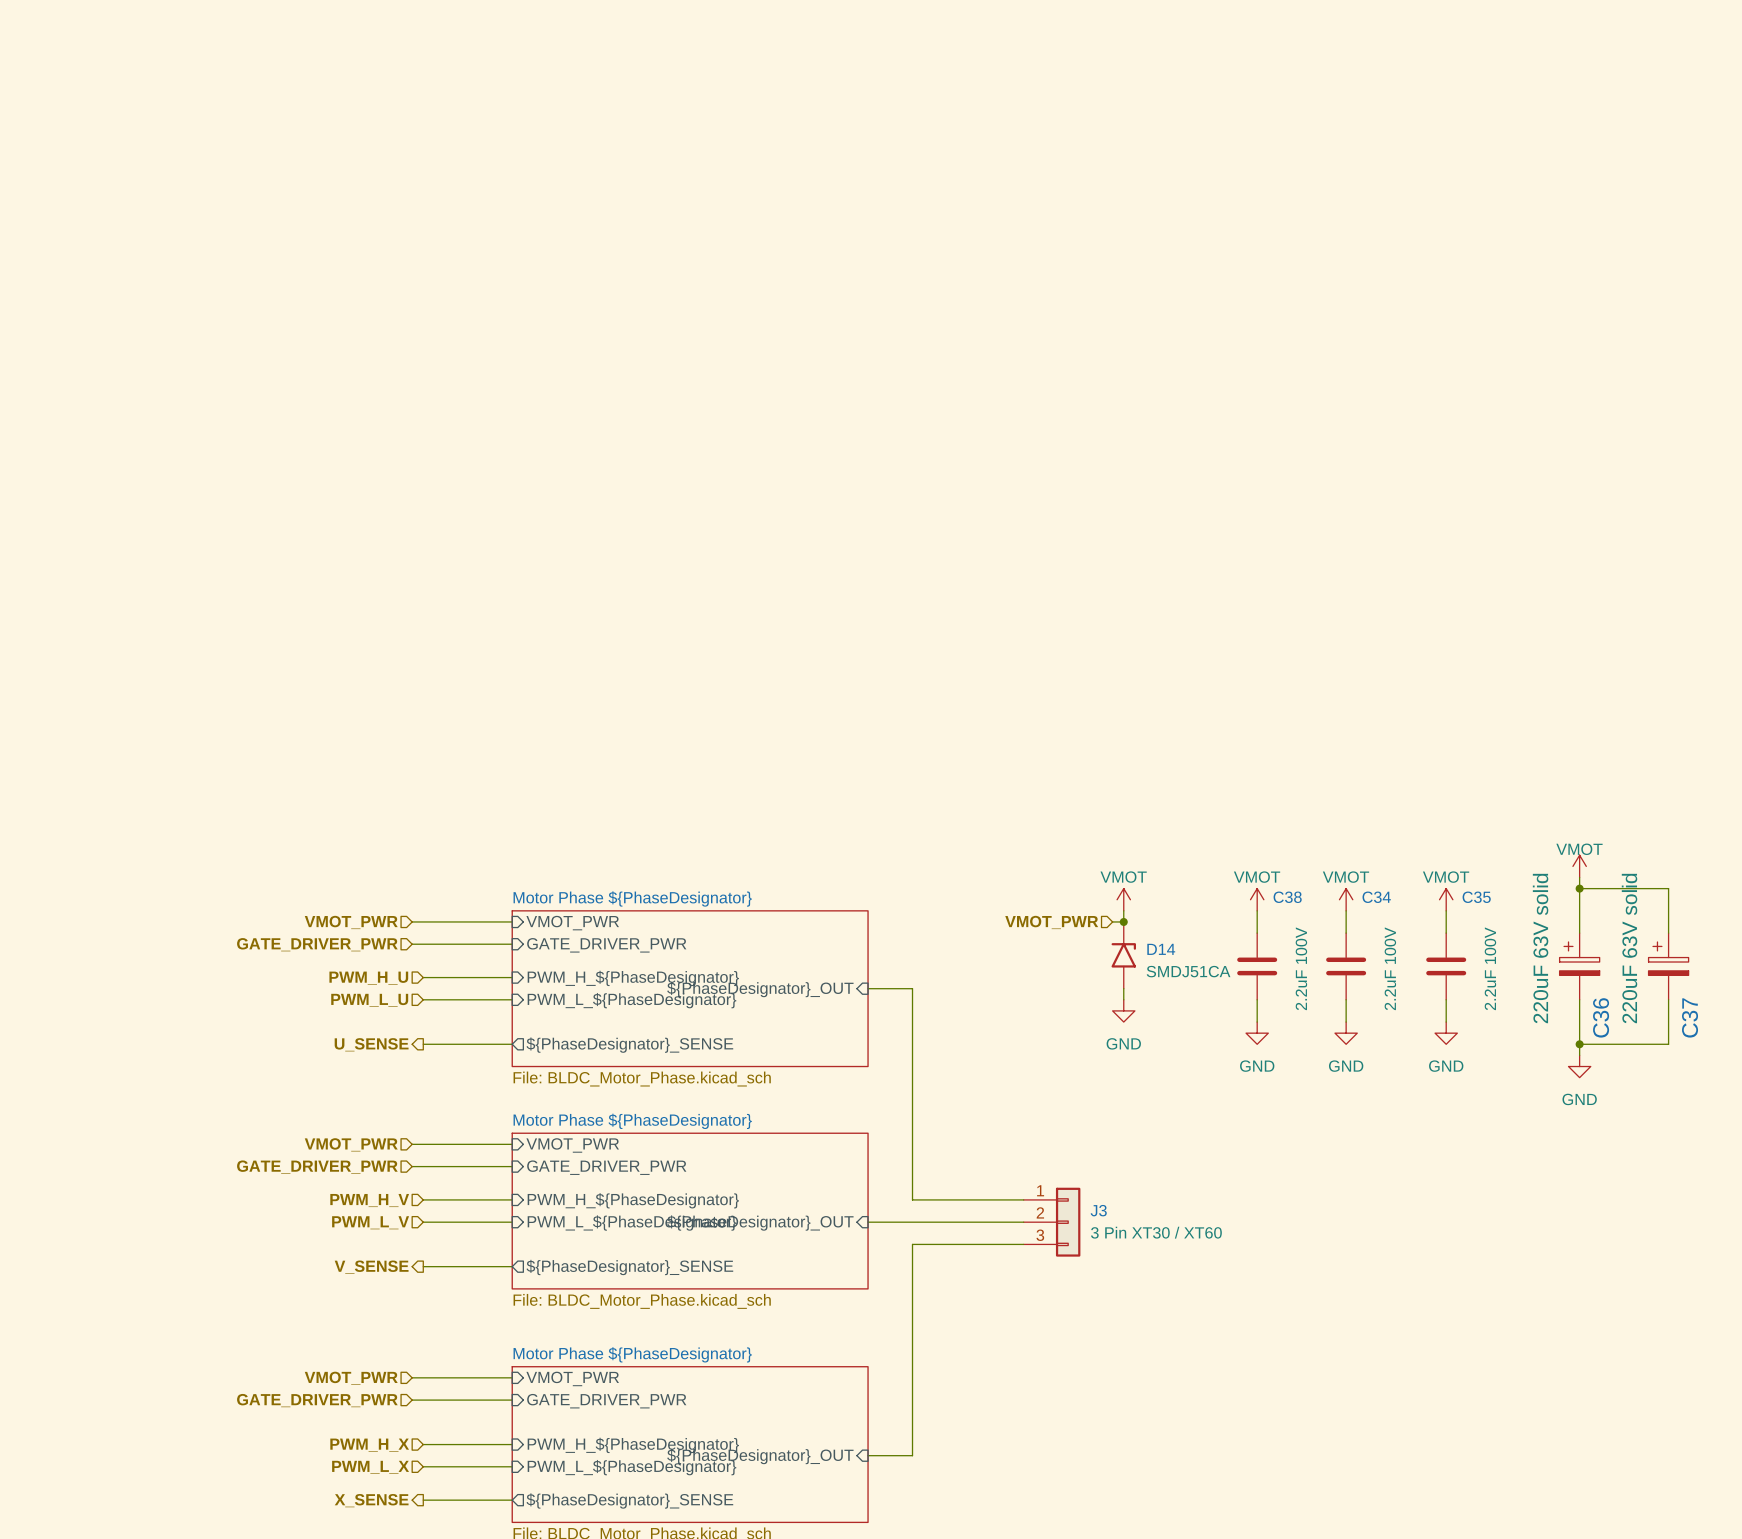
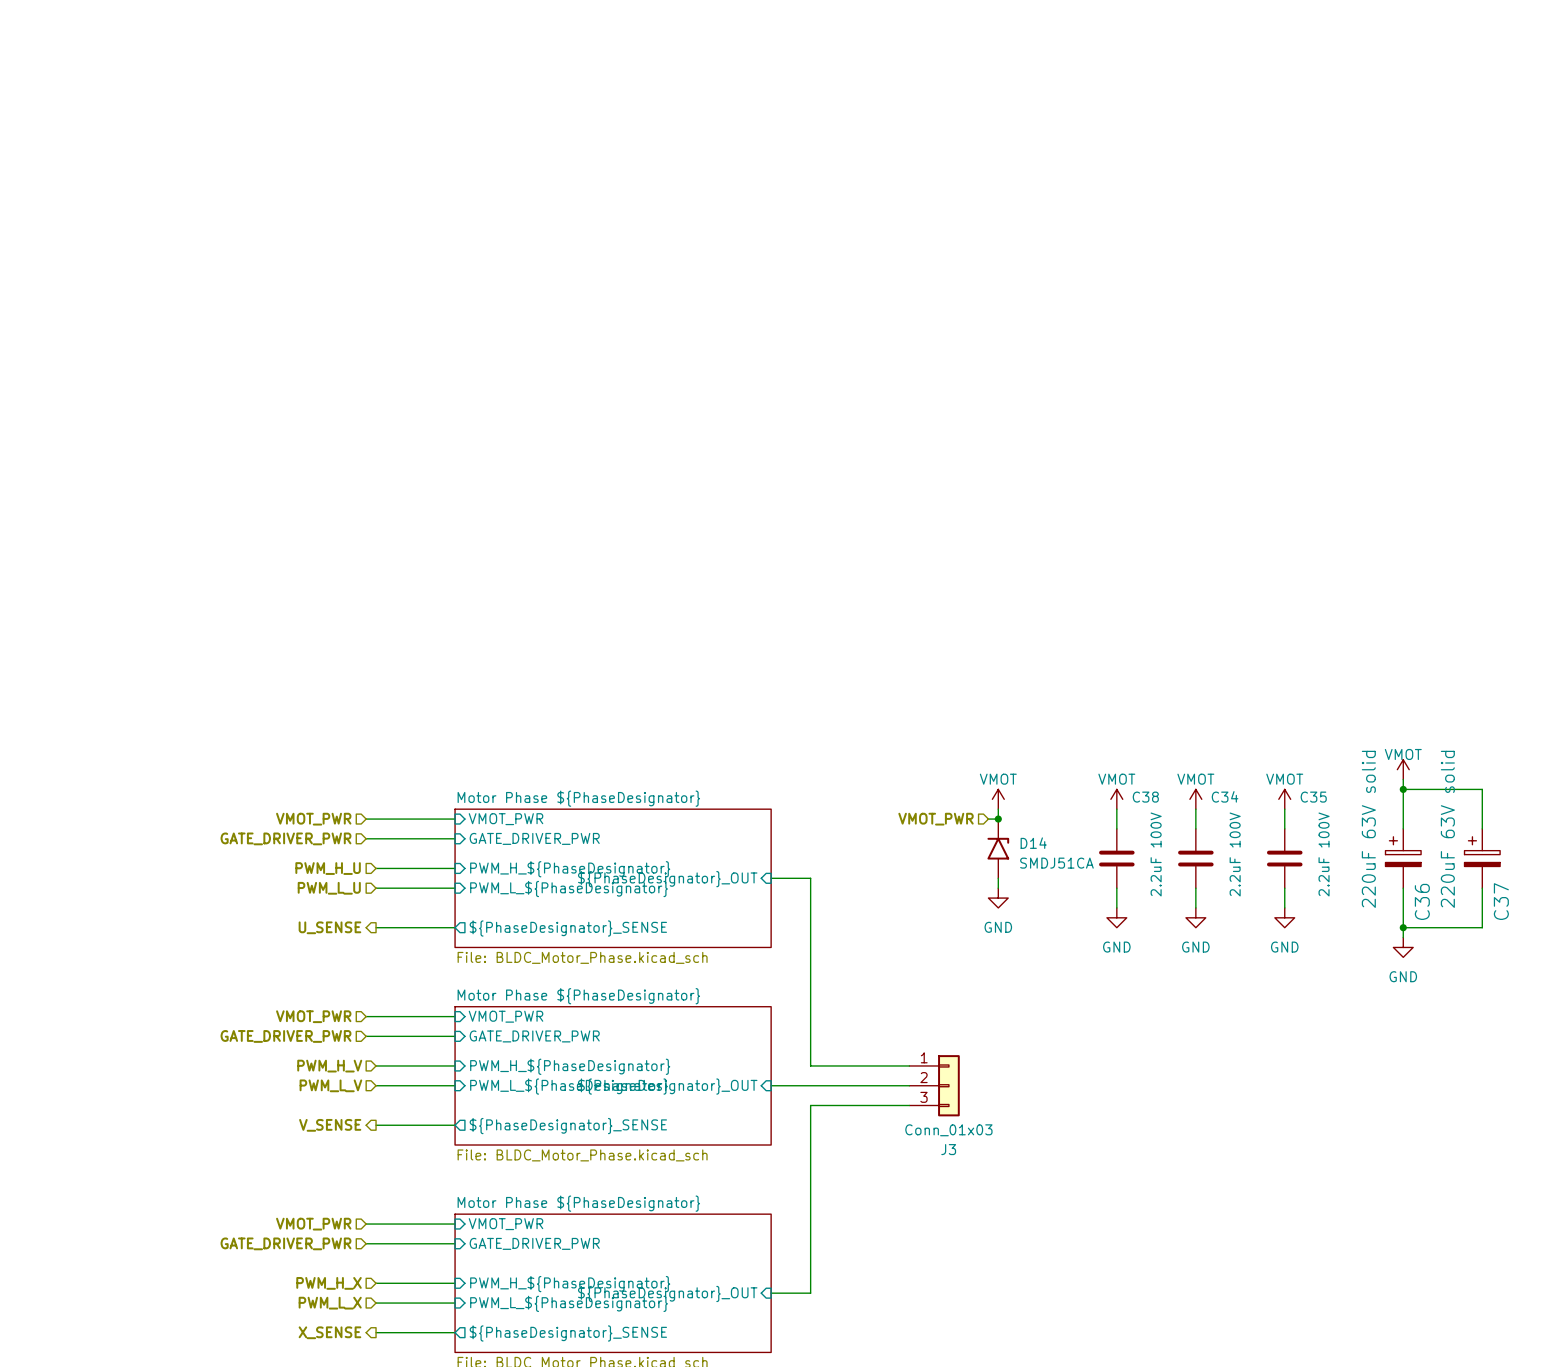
J3 name position: J3 (1098, 1210) -> J3 (948, 1149)
J3 value: 3 Pin XT30 / XT60 (1156, 1232) -> Conn_01x03 (948, 1130)

